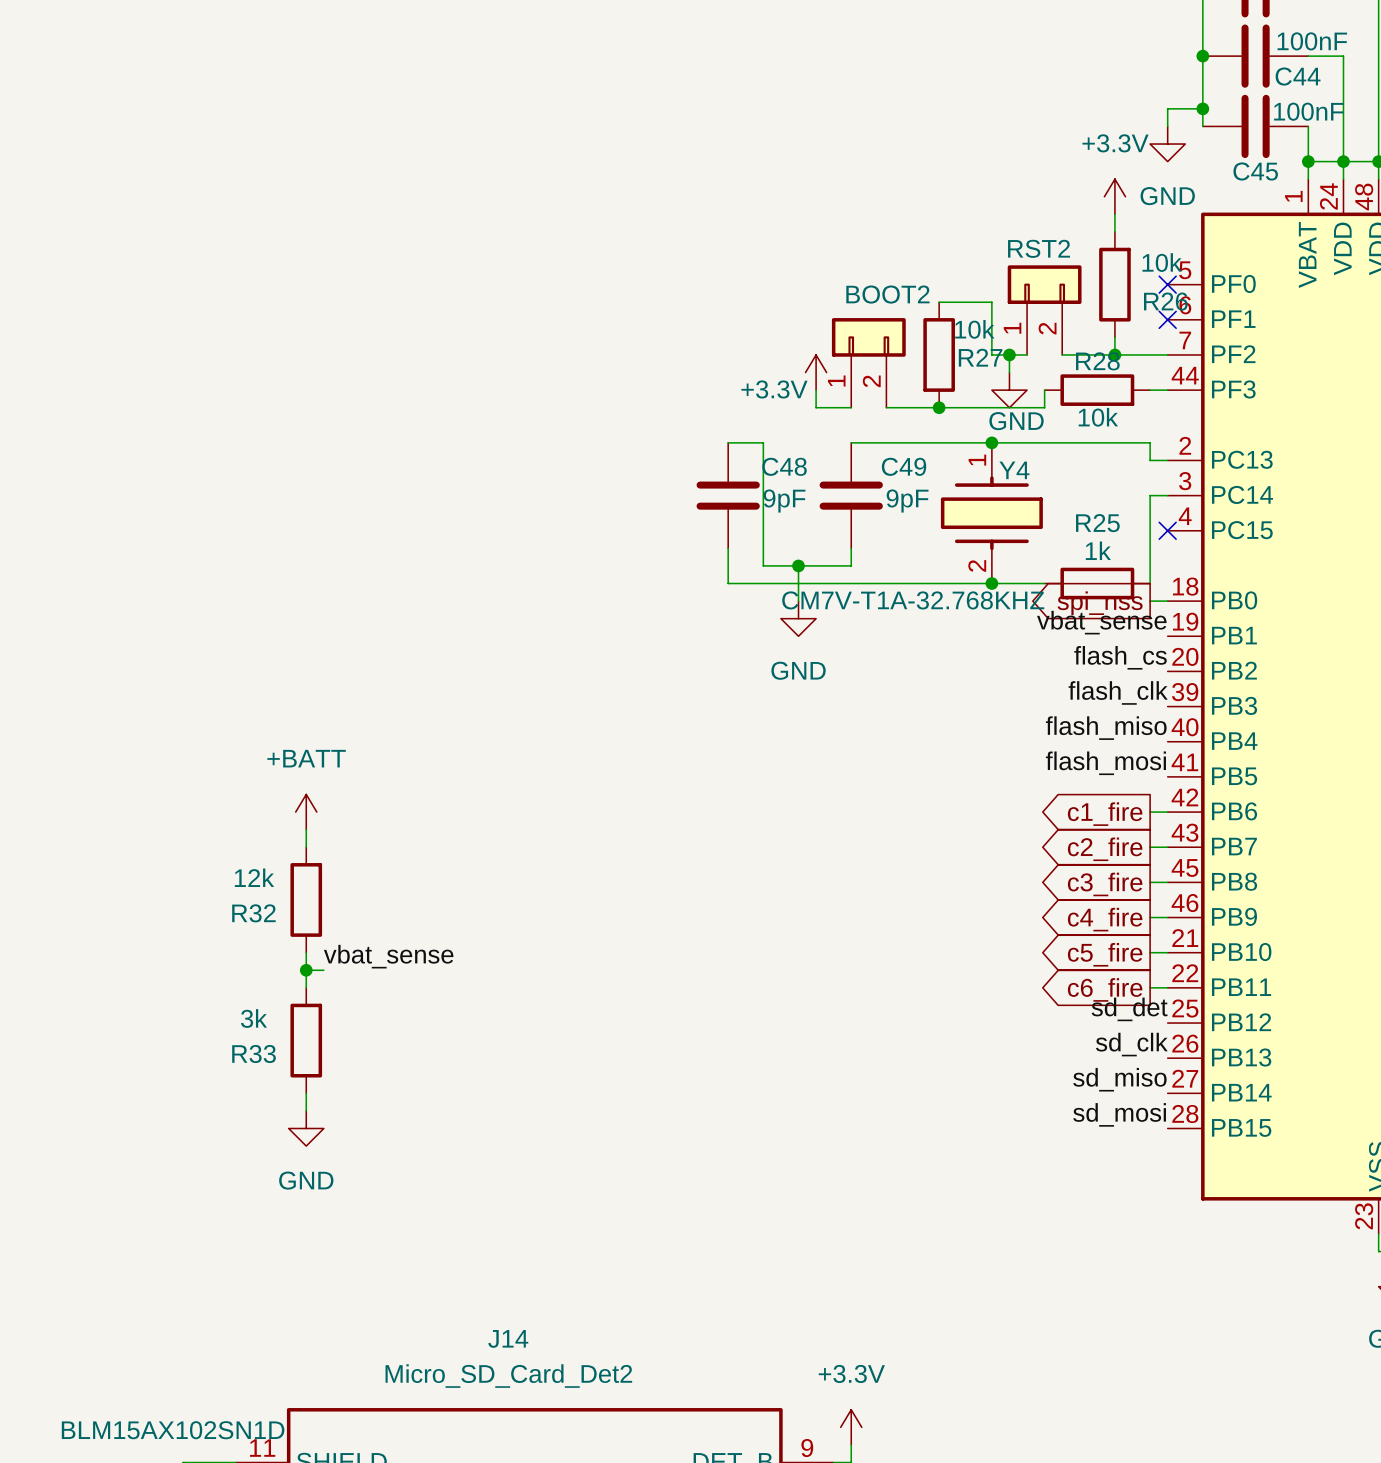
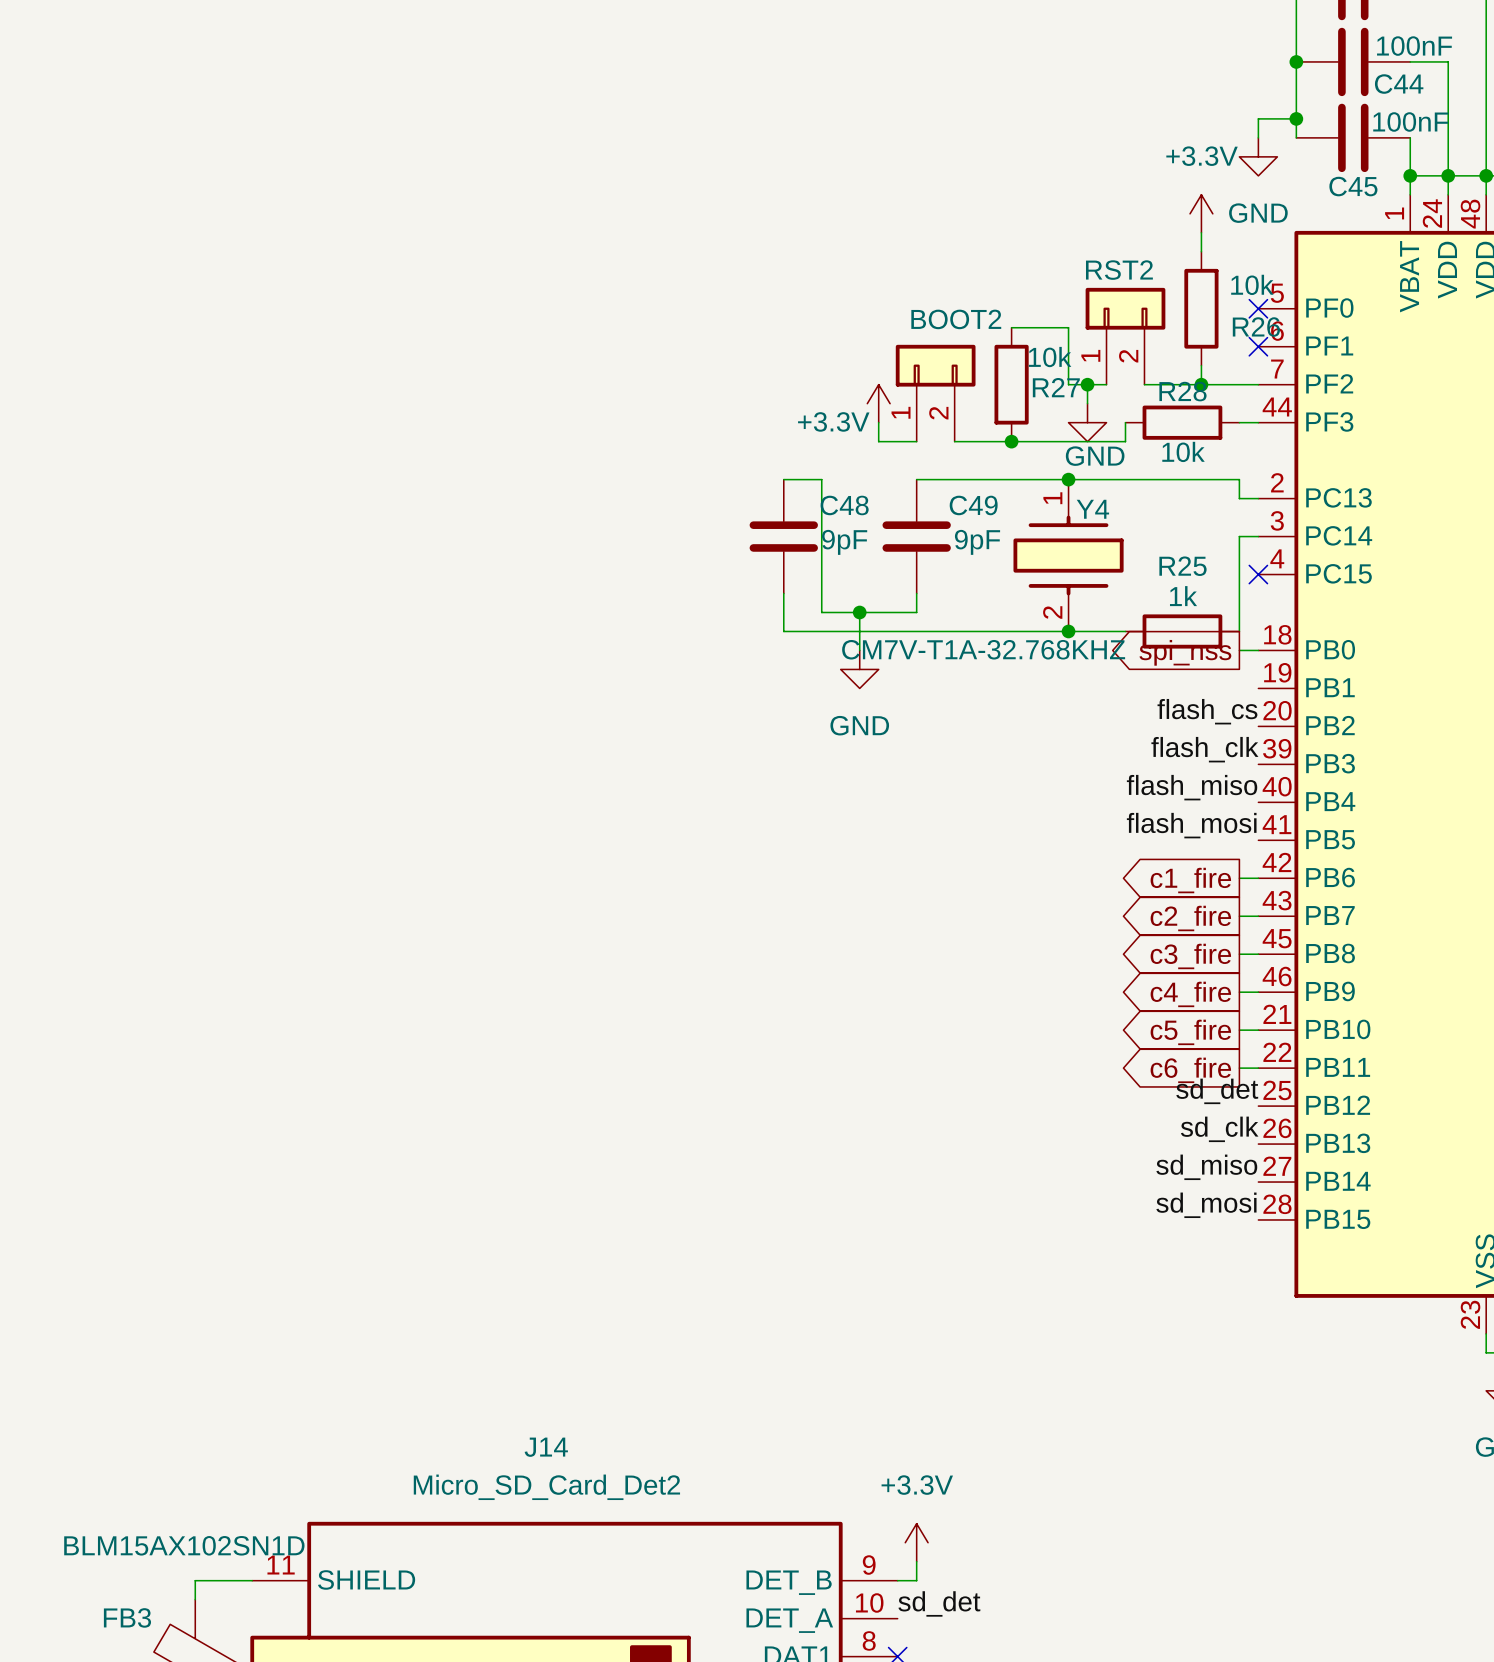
label: vbat_sense (1101, 622) -> none
power symbol: +BATT (306, 812) -> none
wire: (306, 829) (306, 847) -> none
R32: 12k (306, 899) -> none
wire: (306, 952) (306, 987) -> none
label: vbat_sense (388, 956) -> none
wire: (306, 970) (323, 970) -> none
junction: (306, 970) -> none
R33: 3k (306, 1040) -> none
wire: (306, 1093) (306, 1110) -> none
power symbol: GND (306, 1128) -> none

